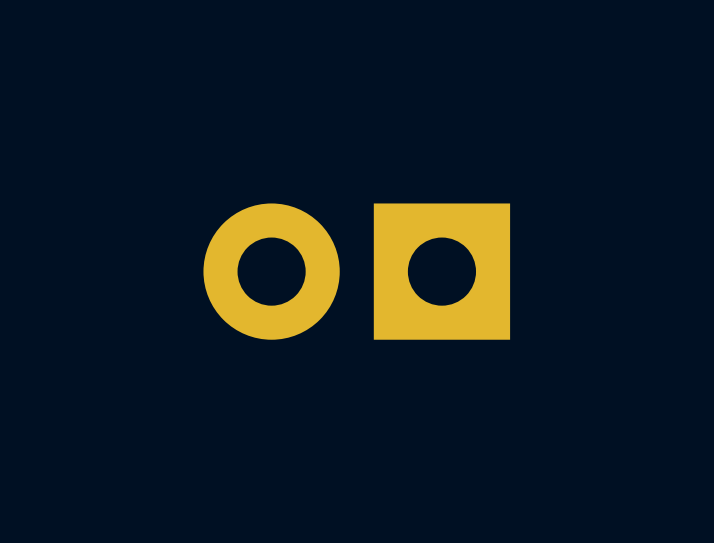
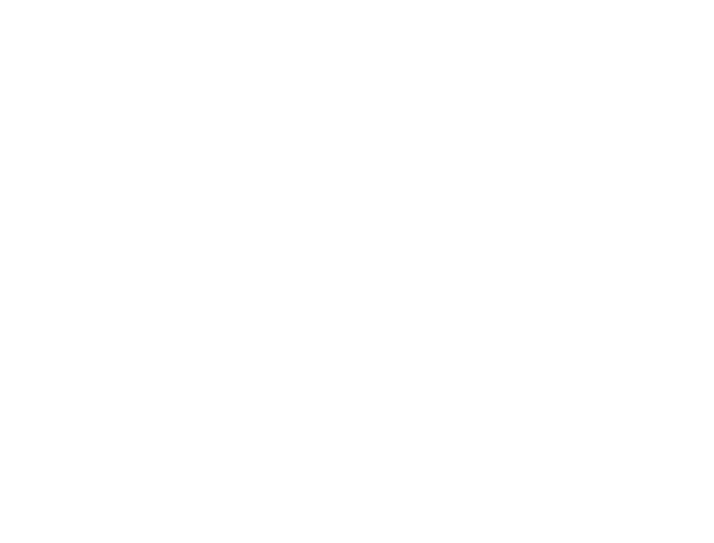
part: (356, 271) -> none

